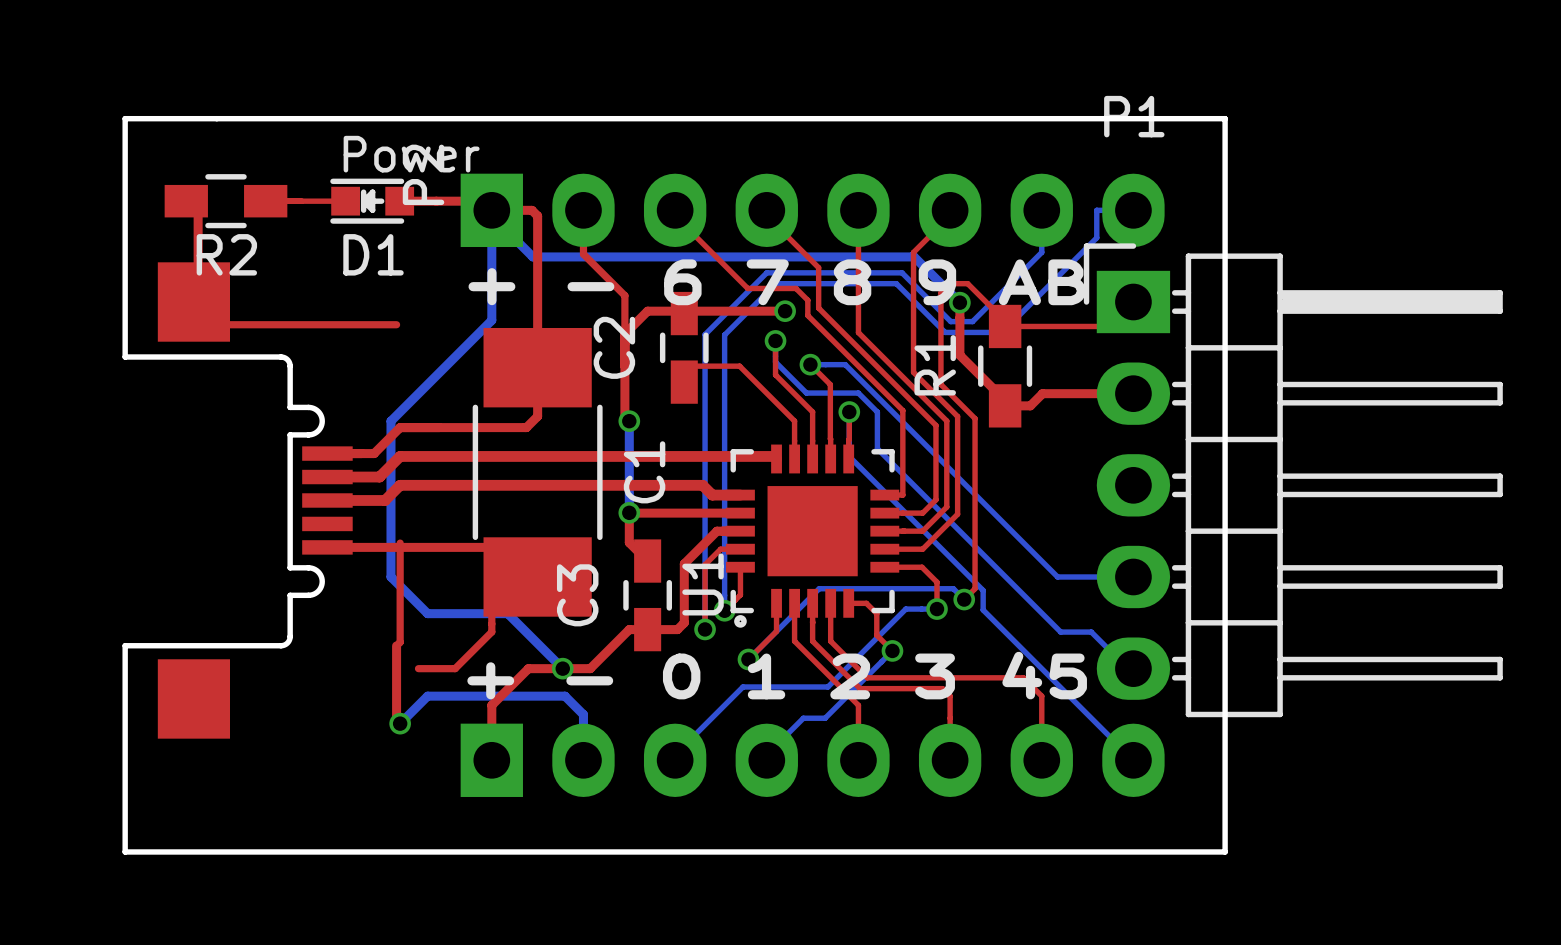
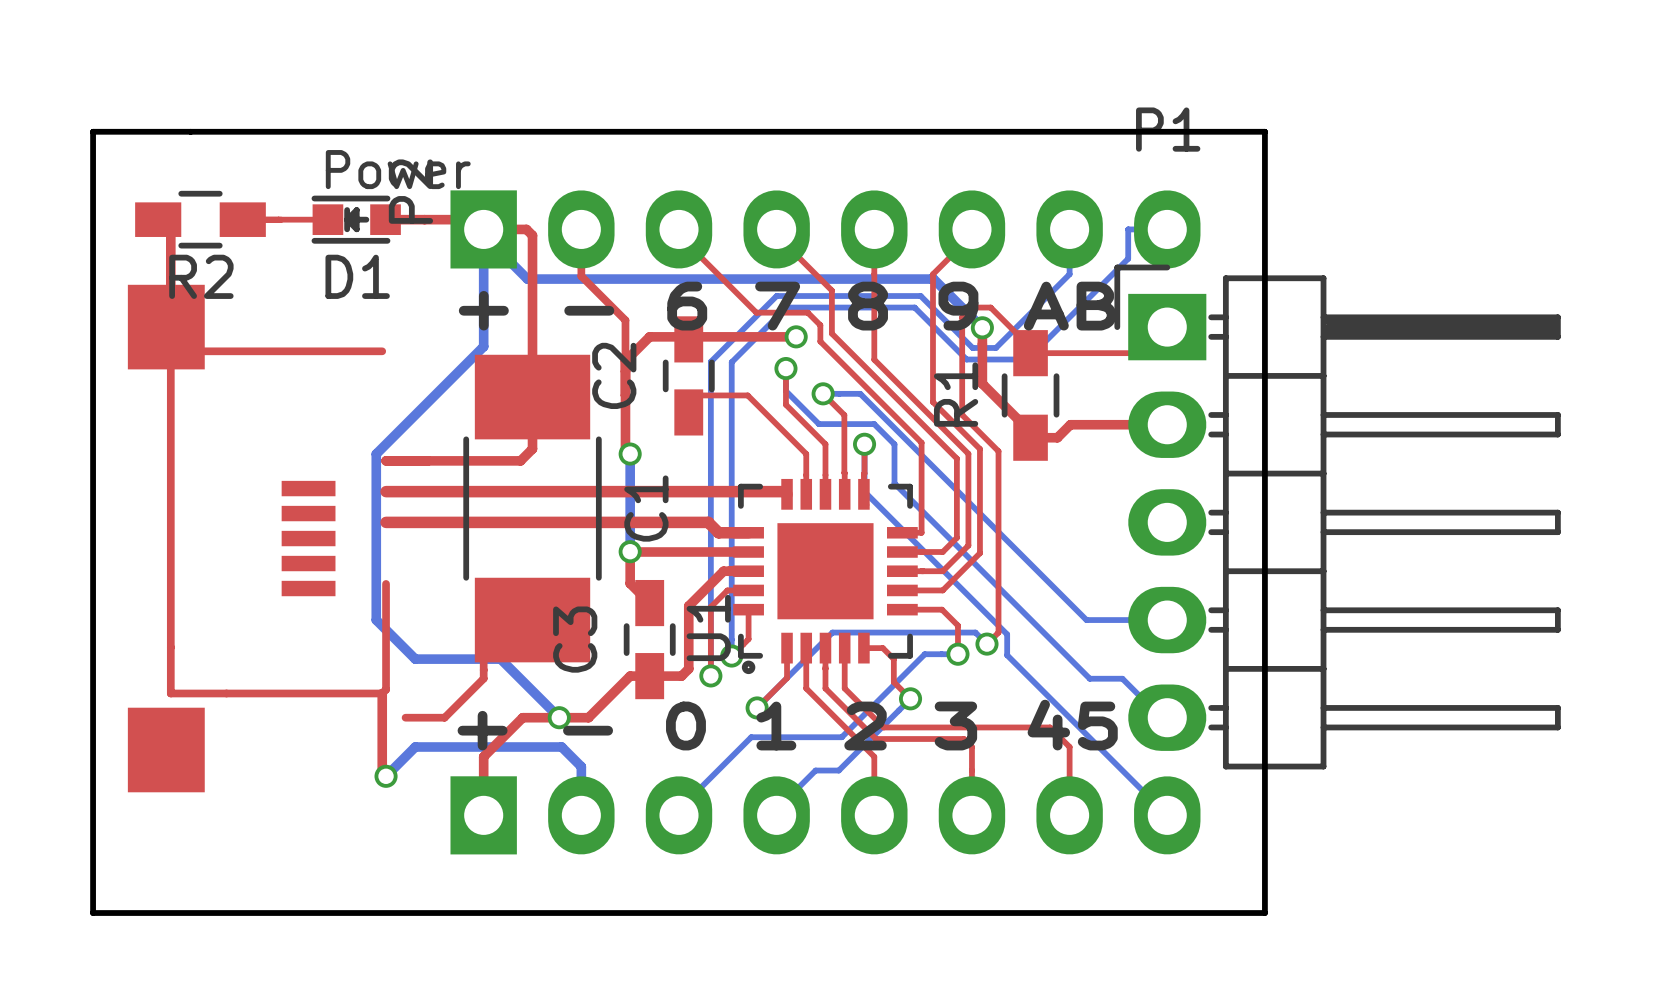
top track: none -> (170, 351) (170, 693) (382, 693)
board edge: (125, 357) (283, 357) (287, 359) (290, 364) (290, 407) (312, 407) (320, 414) (321, 424) (316, 432) (310, 434) (290, 434) (290, 567) (313, 568) (320, 574) (322, 583) (319, 589) (313, 594) (290, 595) (290, 637) (286, 643) (280, 645) -> (93, 385) (93, 693)
top track: (400, 427) (374, 453) (327, 453) -> none
top track: (400, 456) (379, 477) (327, 477) -> none
top track: (400, 485) (384, 500) (327, 500) -> none
top track: (327, 547) (508, 547) (537, 576) -> none
board edge: (125, 645) (280, 645) -> none

